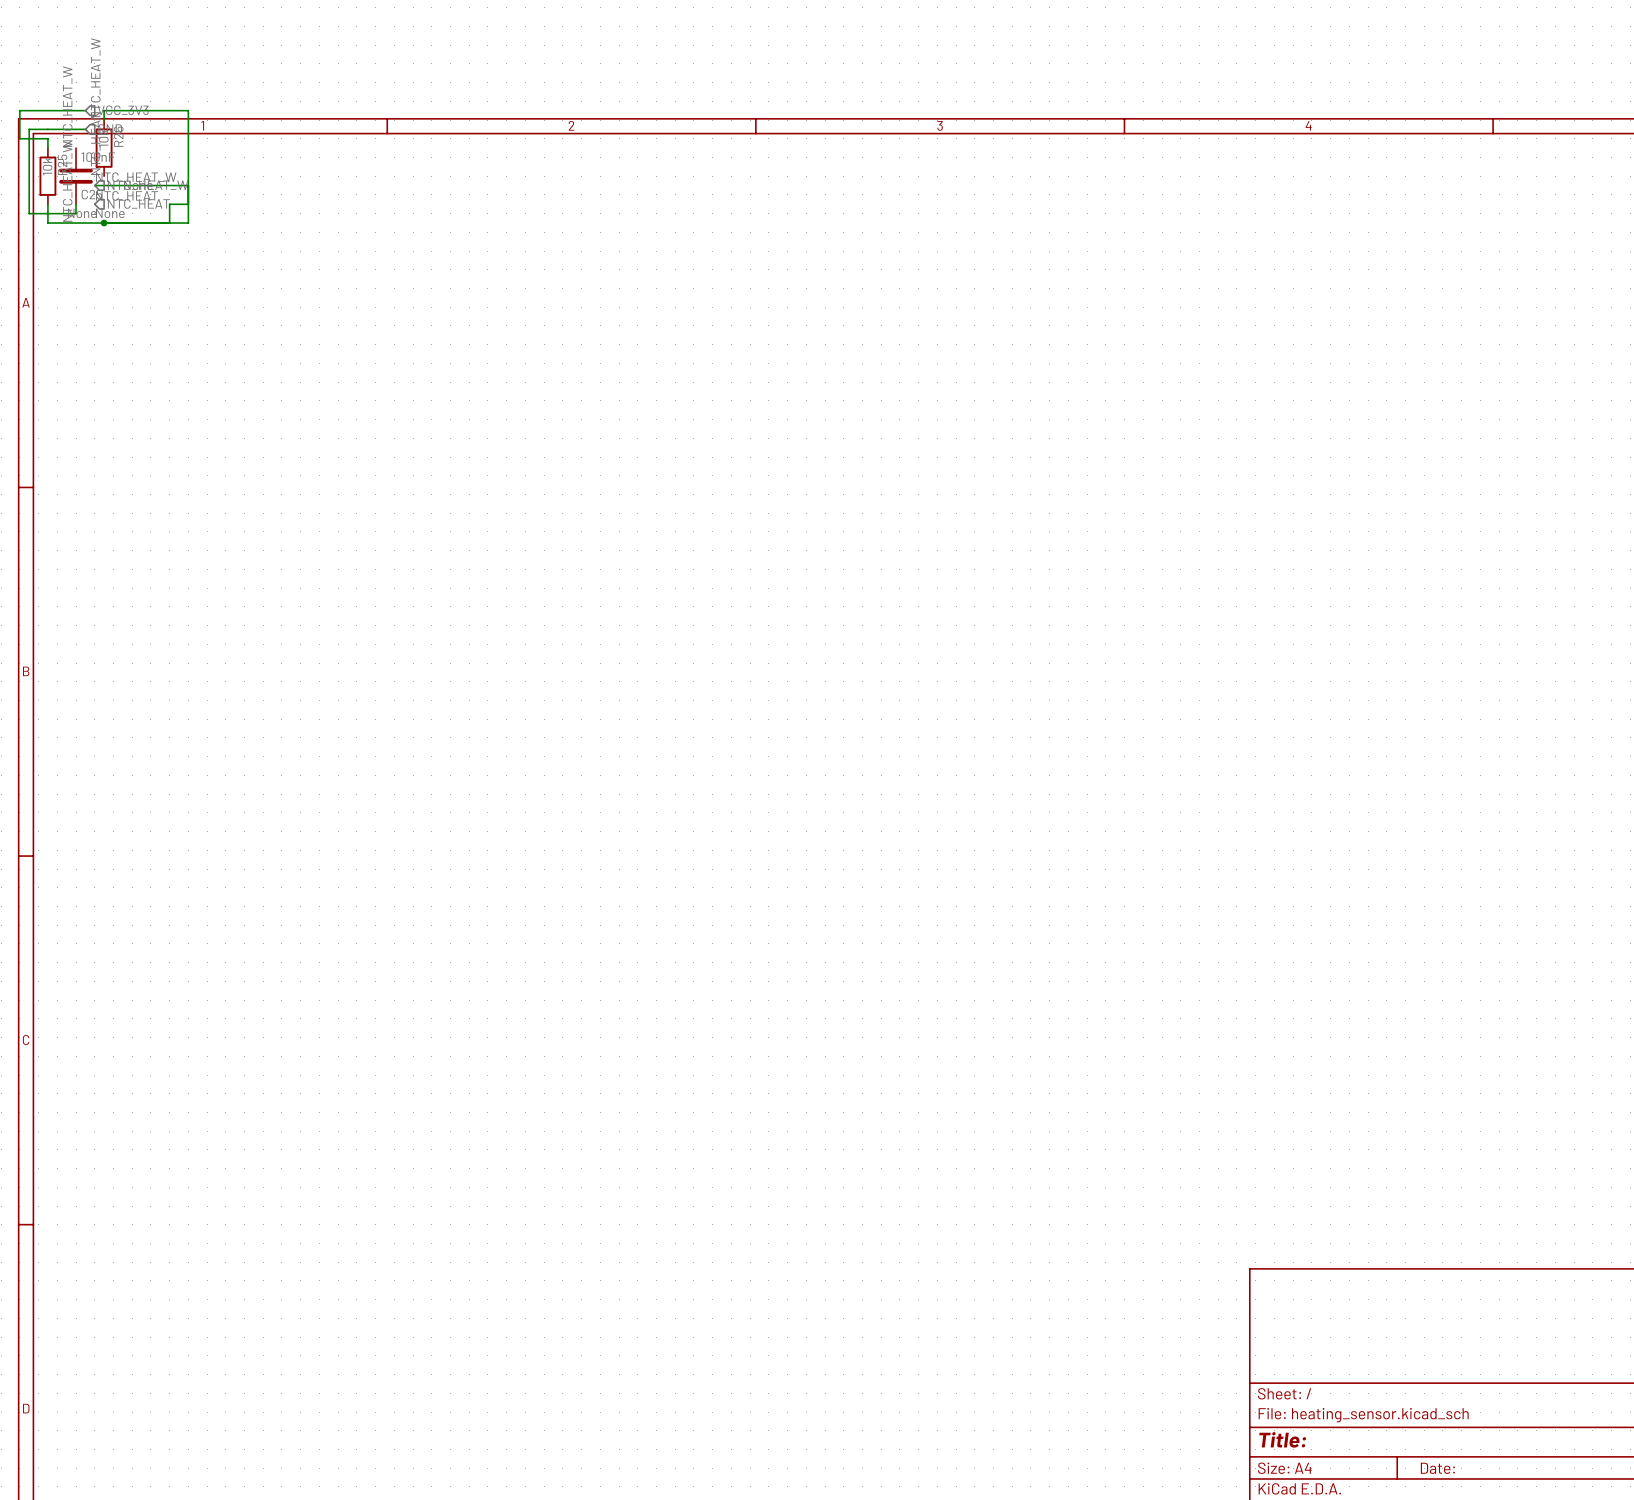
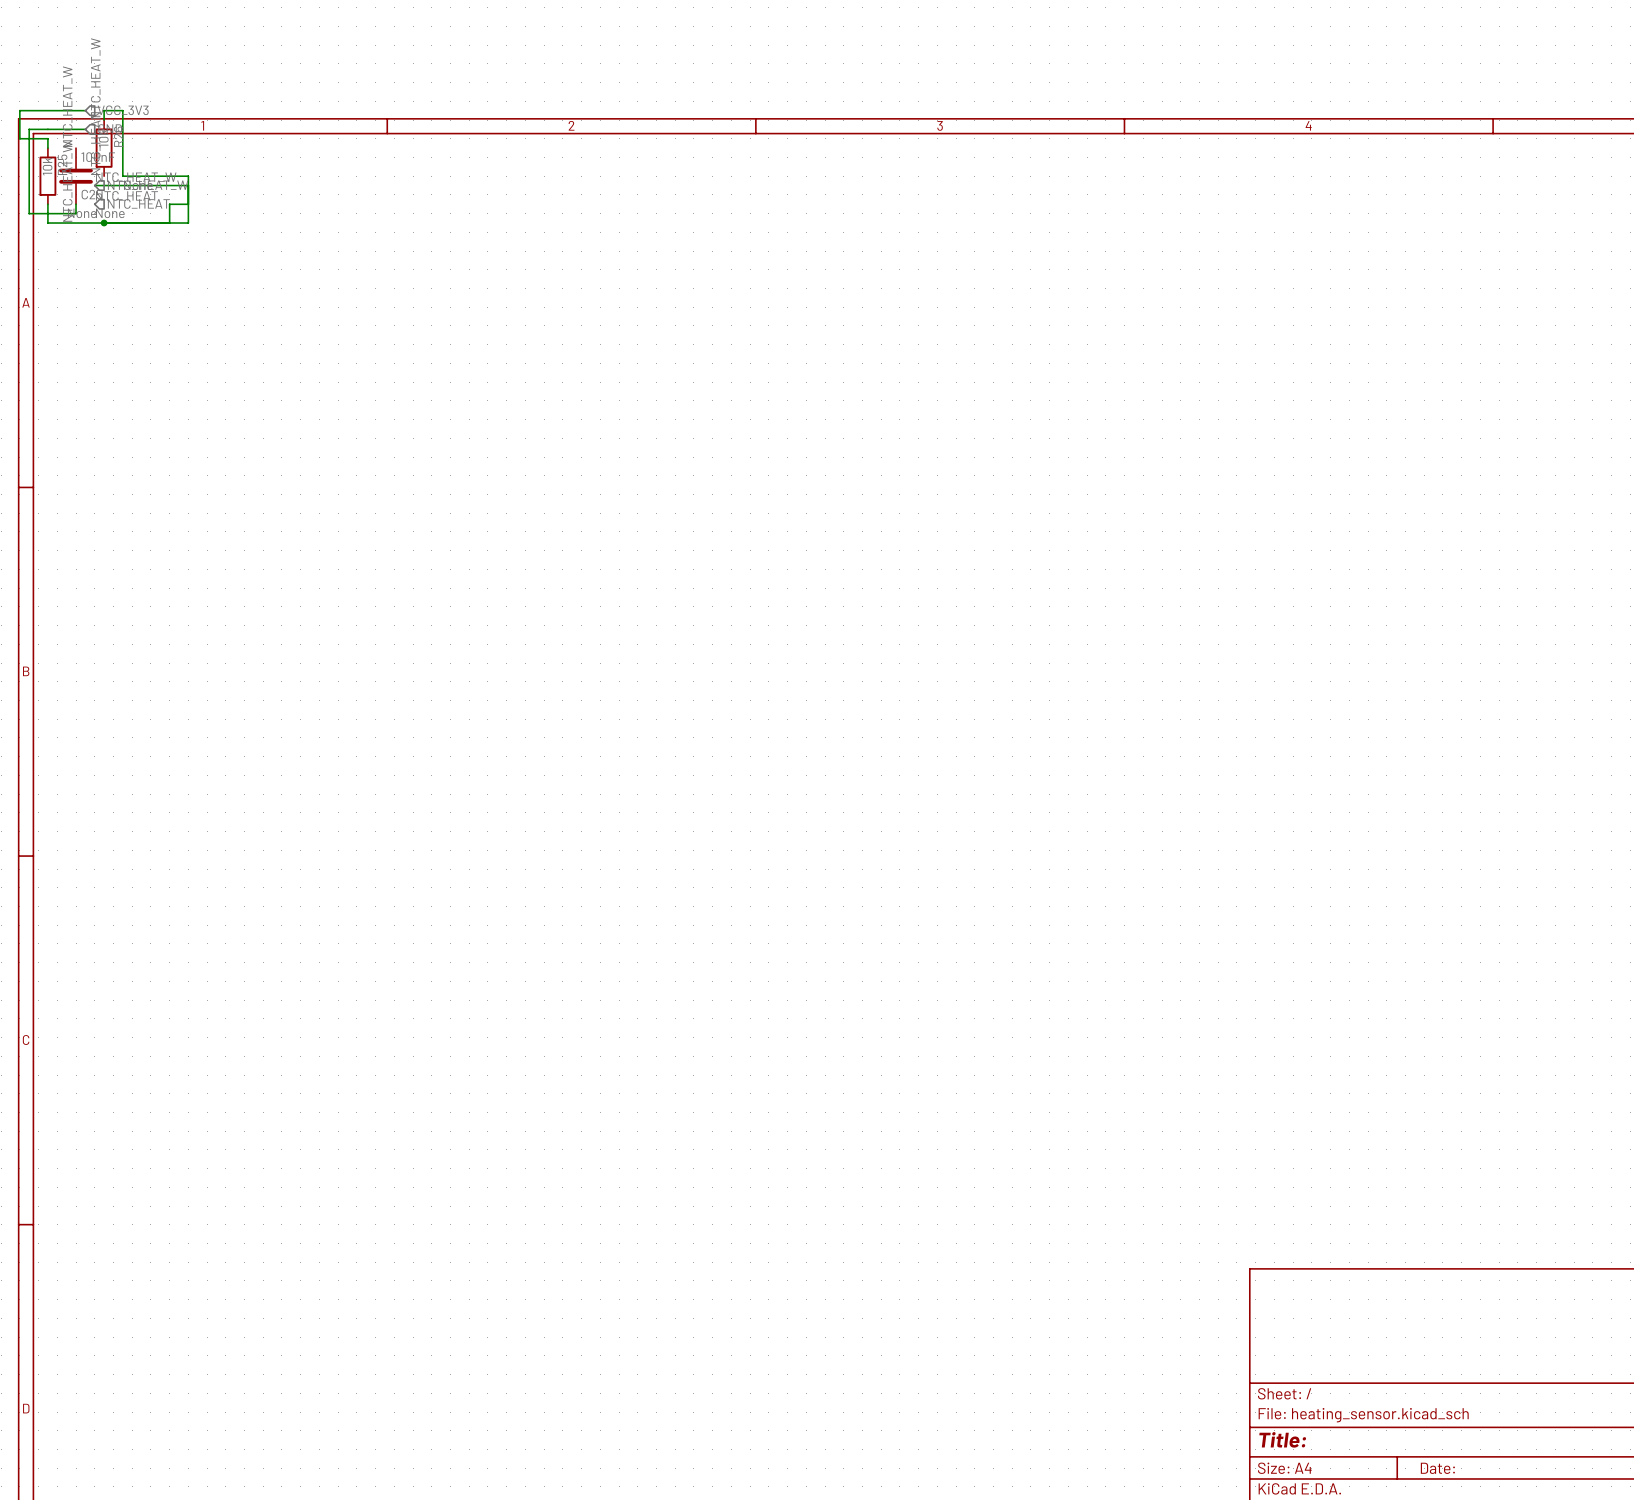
wire: (122, 110) (188, 110) (188, 176) -> (122, 110) (122, 176) (188, 176)

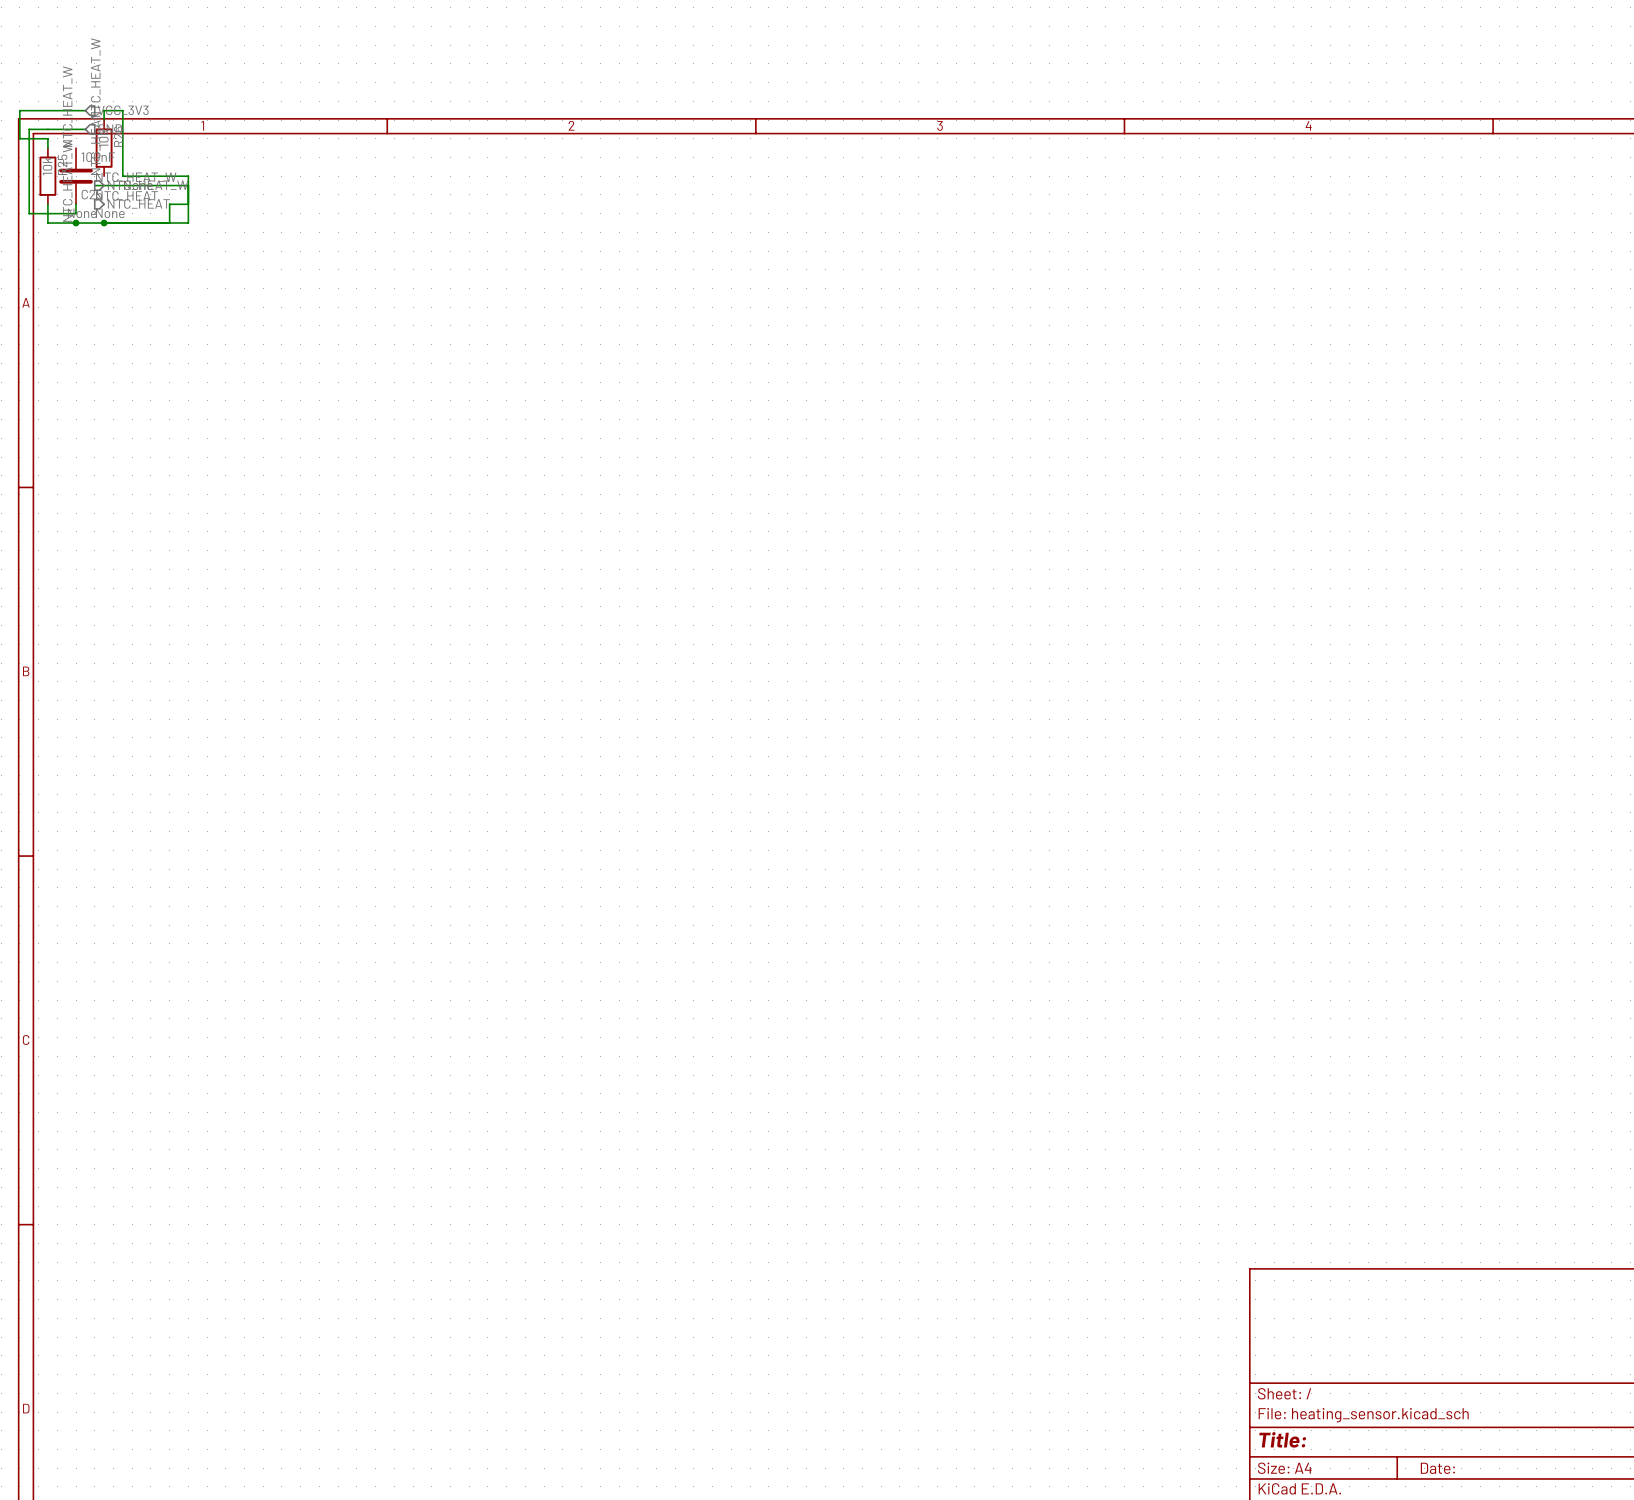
hierarchical label shape: input (148, 185) -> output (148, 185)
hierarchical label shape: input (138, 203) -> output (138, 203)
junction: none -> (76, 223)

